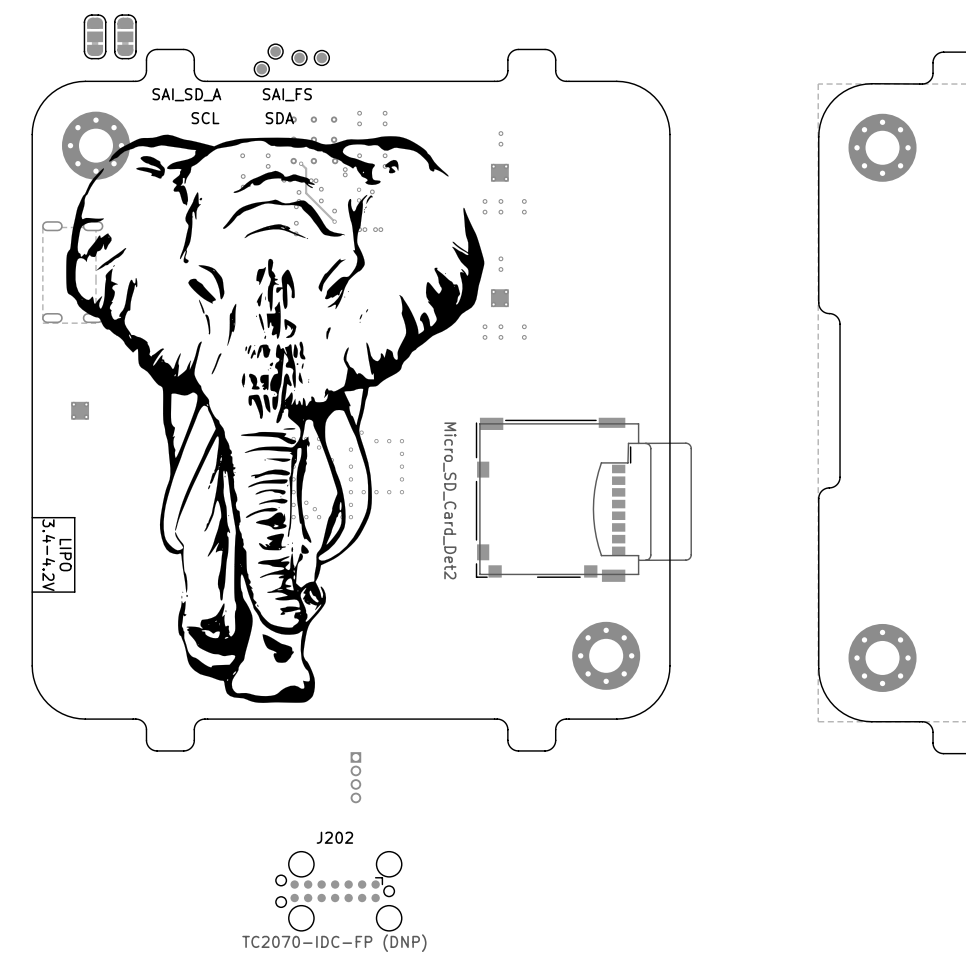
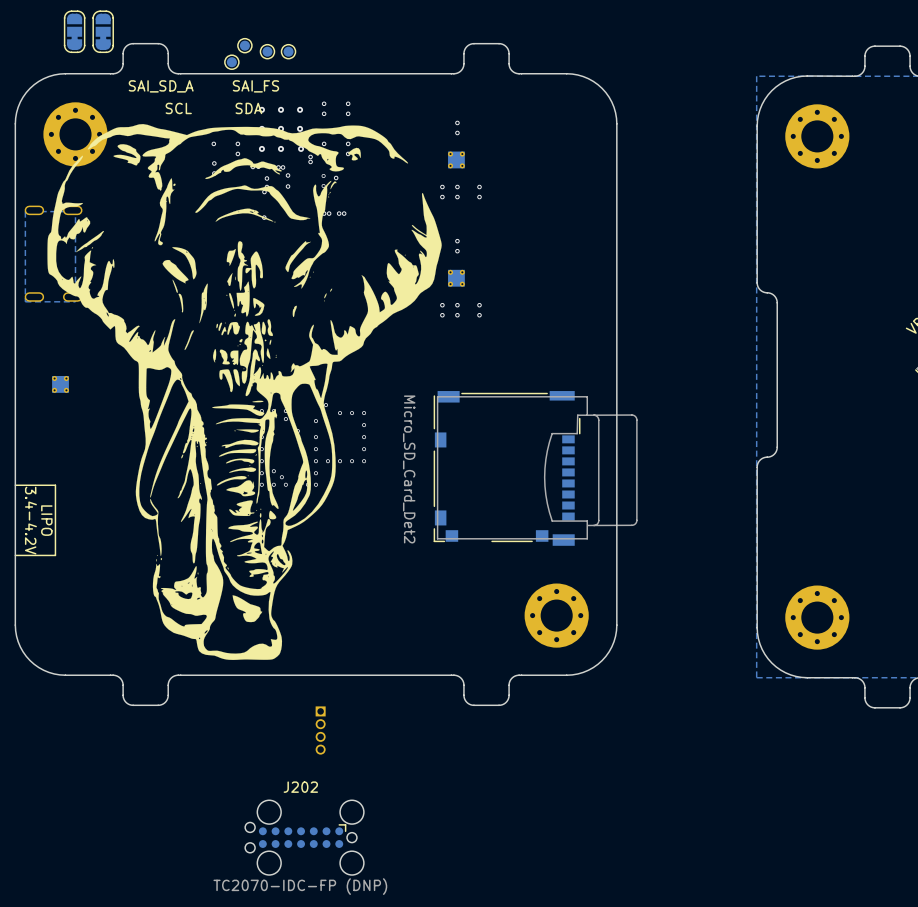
track: (301, 163) (306, 168) (306, 193) (334, 221) -> none
via: (301, 163) -> none
via: (334, 211) -> none
via: (334, 221) -> none
via: (296, 223) -> none

